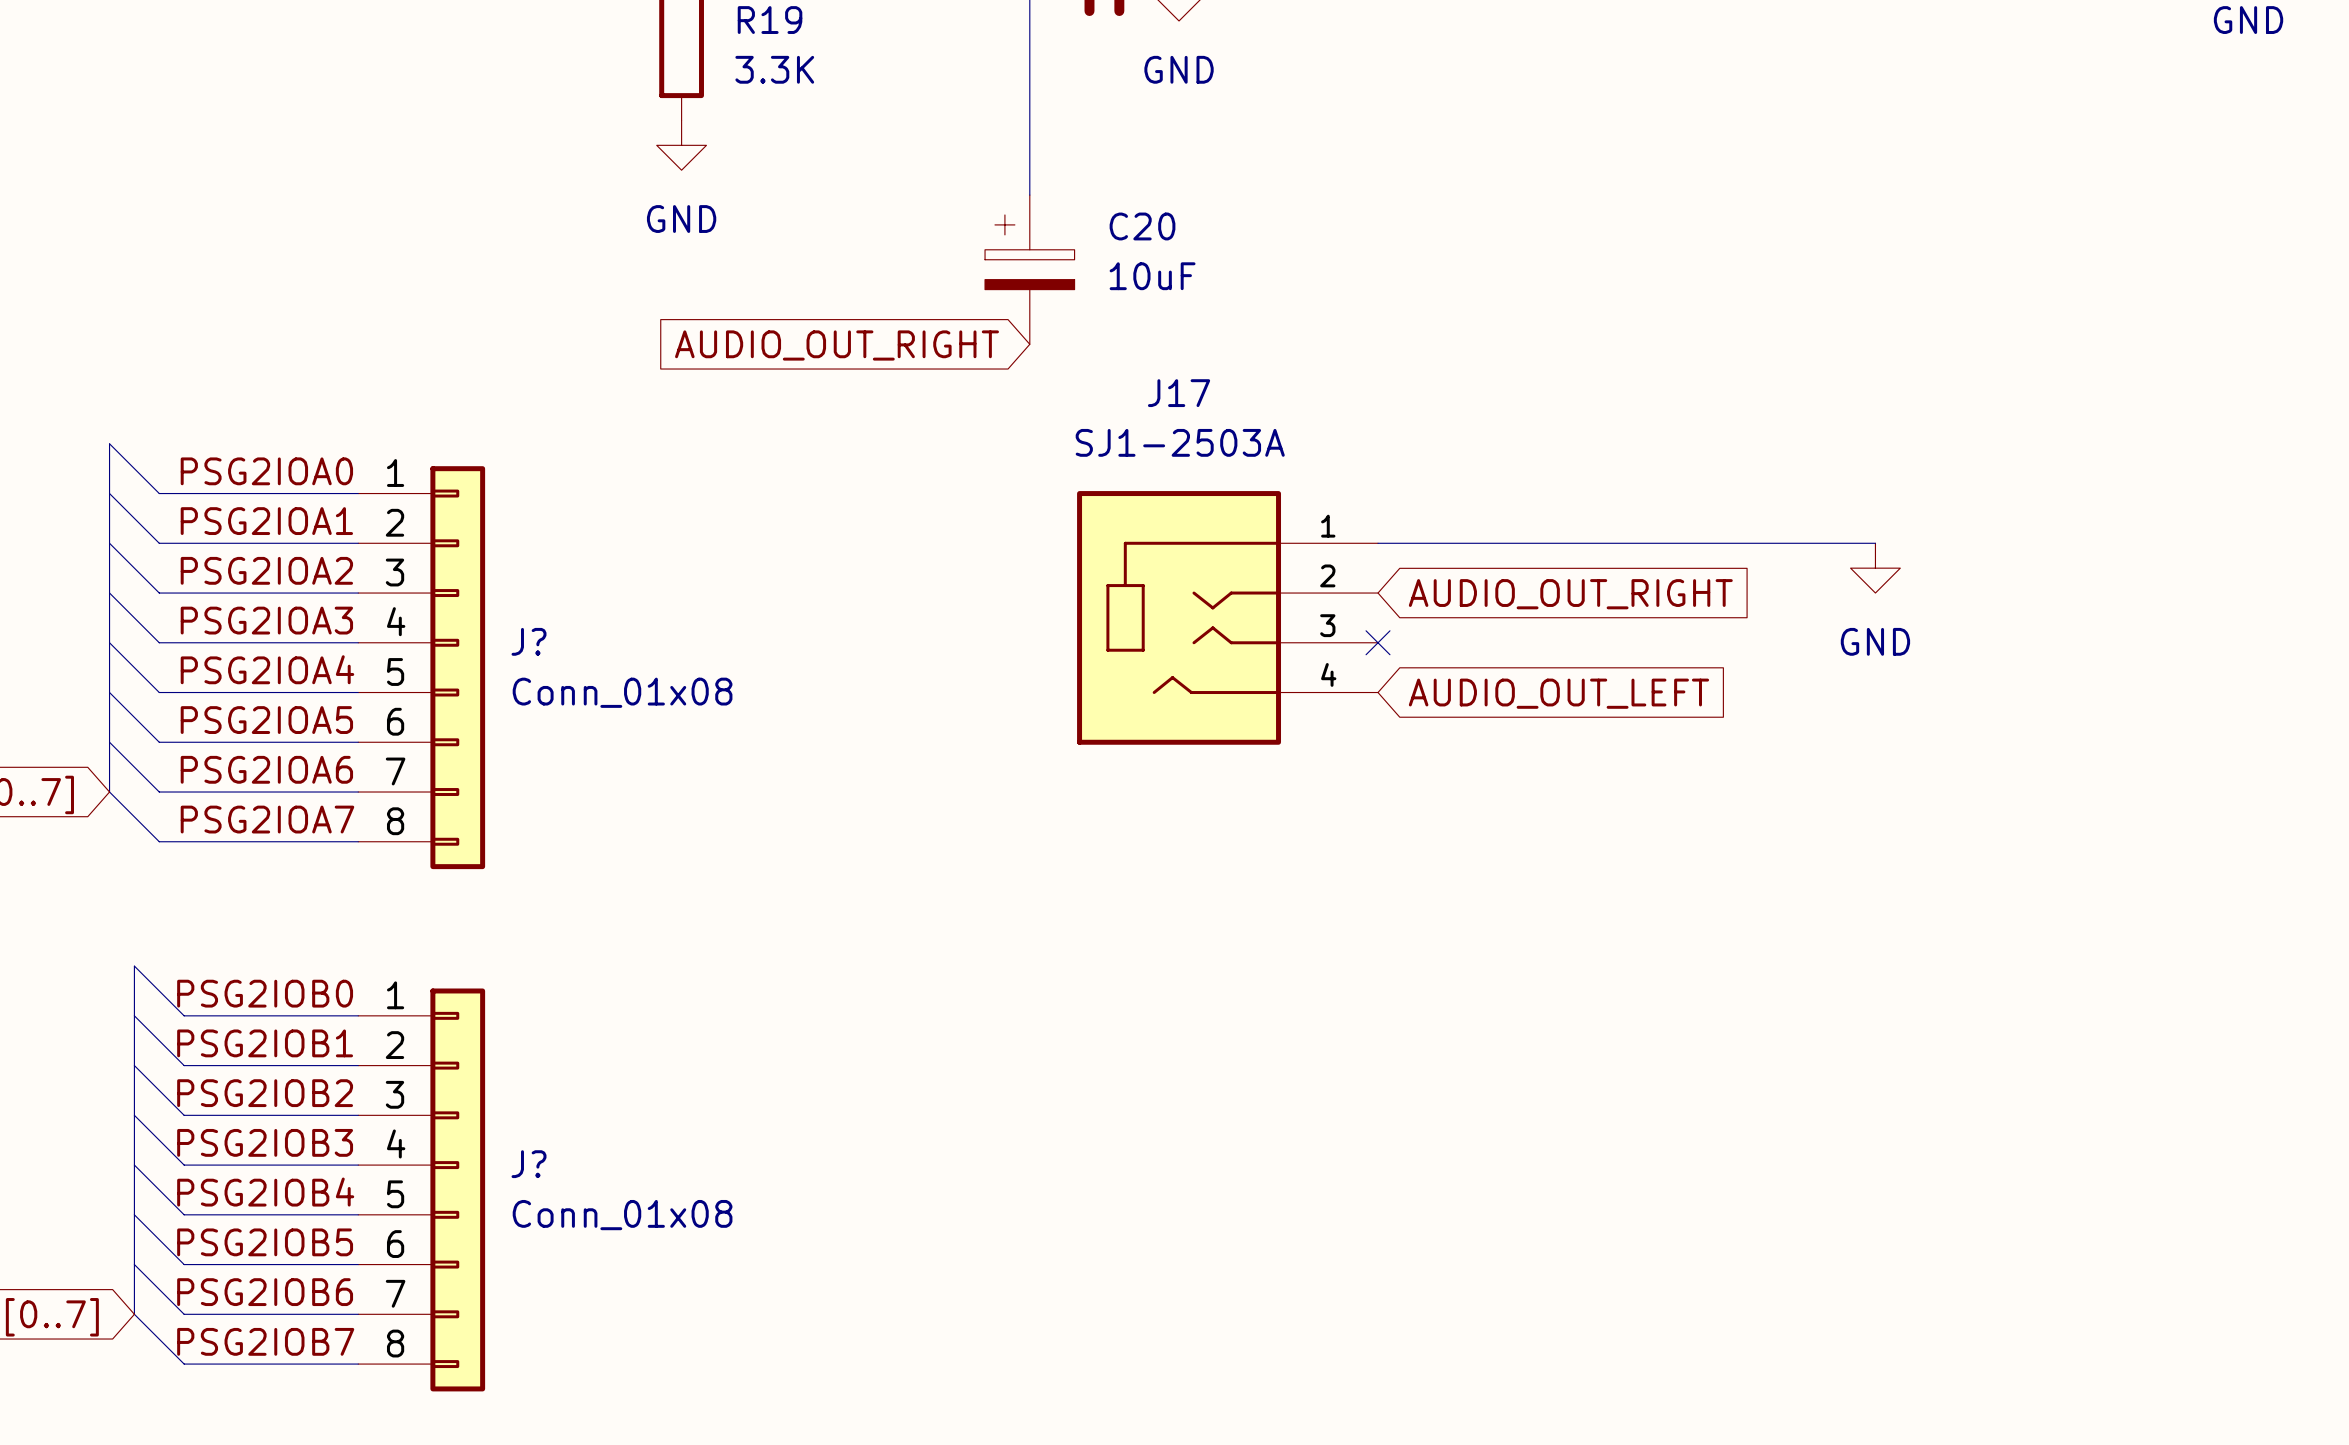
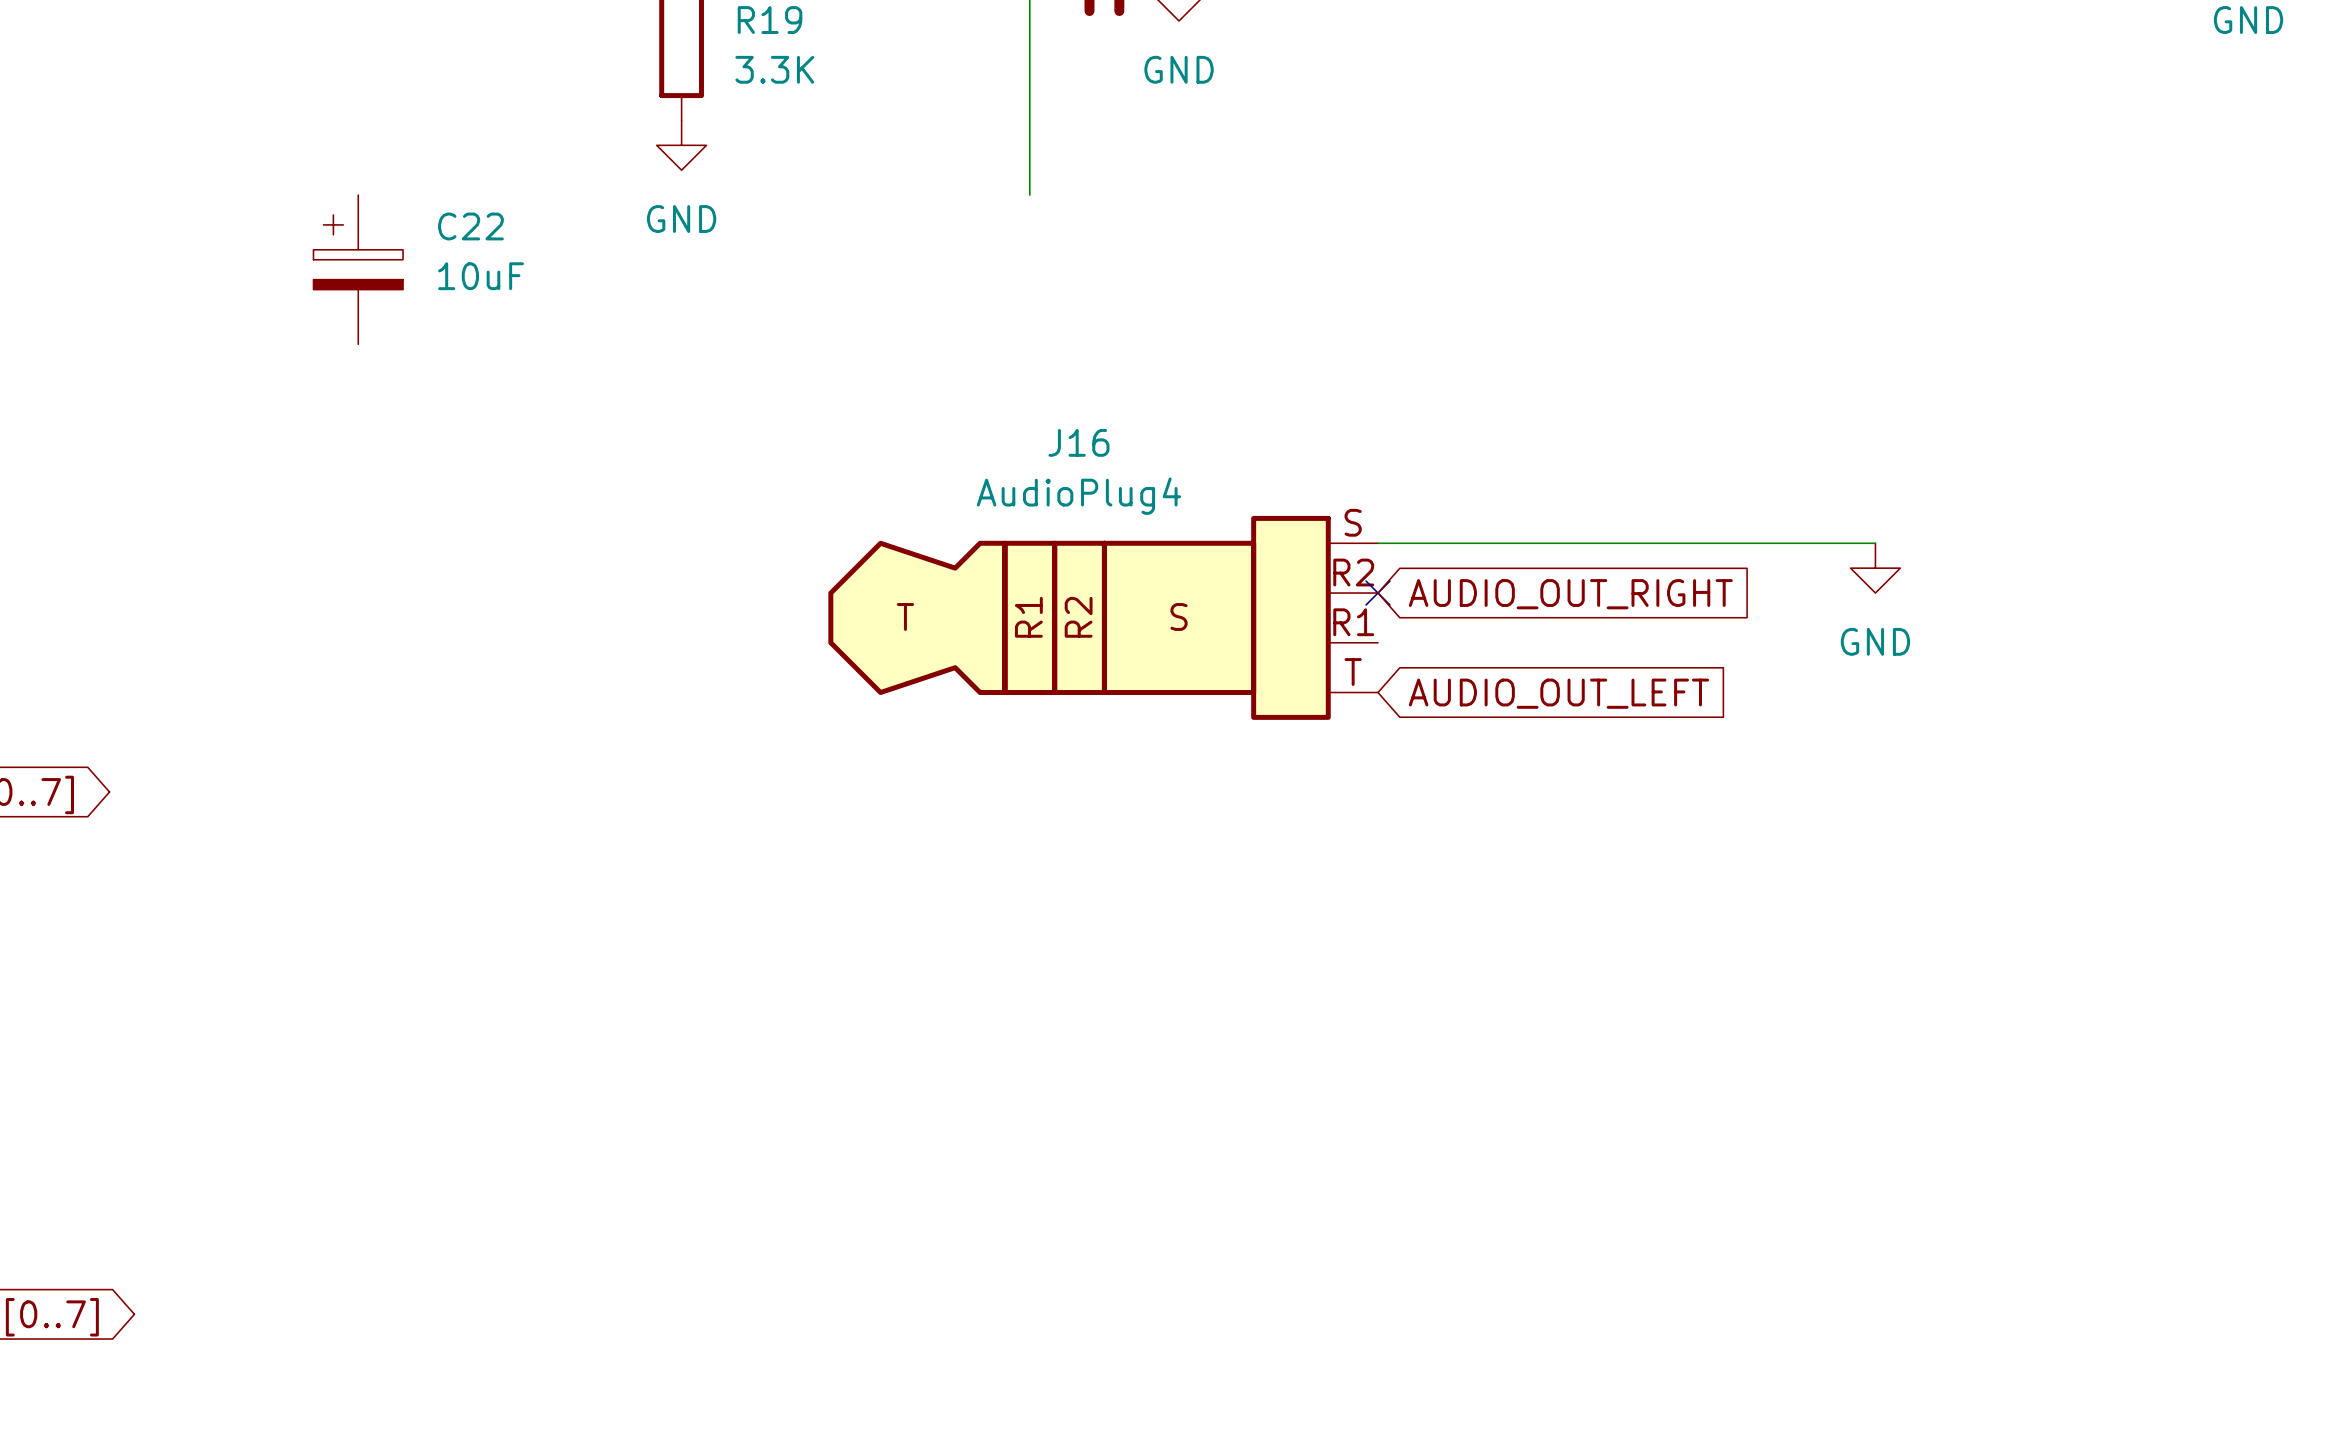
C22: none -> 10uF (358, 269)
C20: 10uF (1029, 269) -> none
global label: AUDIO_OUT_RIGHT (837, 345) -> none
wire: (109, 443) (159, 493) (358, 493) -> none
bus: (109, 443) (109, 792) -> none
label: PSG2IOA0 (266, 471) -> none
wire: (109, 493) (159, 543) (358, 543) -> none
label: PSG2IOA1 (266, 521) -> none
wire: (109, 543) (159, 593) (358, 593) -> none
label: PSG2IOA2 (266, 570) -> none
wire: (109, 593) (159, 642) (358, 642) -> none
J16: none -> AudioPlug4 (1103, 617)
J17: SJ1-2503A (1227, 617) -> none
label: PSG2IOA3 (266, 620) -> none
wire: (109, 642) (159, 692) (358, 692) -> none
no-connect mark position: (1378, 642) -> (1378, 593)
J?: Conn_01x08 (421, 667) -> none
label: PSG2IOA4 (267, 669) -> none
wire: (109, 692) (159, 742) (358, 742) -> none
label: PSG2IOA5 (266, 720) -> none
wire: (109, 742) (159, 792) (358, 792) -> none
label: PSG2IOA6 (266, 769) -> none
wire: (109, 792) (159, 841) (358, 841) -> none
label: PSG2IOA7 (267, 819) -> none
wire: (134, 966) (184, 1015) (358, 1015) -> none
bus: (134, 966) (134, 1314) -> none
label: PSG2IOB0 (265, 993) -> none
wire: (134, 1015) (184, 1065) (358, 1065) -> none
label: PSG2IOB1 (265, 1043) -> none
wire: (134, 1065) (184, 1115) (358, 1115) -> none
label: PSG2IOB2 (265, 1093) -> none
wire: (134, 1115) (184, 1165) (358, 1165) -> none
label: PSG2IOB3 (265, 1142) -> none
wire: (134, 1165) (184, 1214) (358, 1214) -> none
J?: Conn_01x08 (421, 1189) -> none
label: PSG2IOB4 (265, 1192) -> none
wire: (134, 1214) (184, 1264) (358, 1264) -> none
label: PSG2IOB5 (265, 1242) -> none
wire: (134, 1264) (184, 1314) (358, 1314) -> none
label: PSG2IOB6 (265, 1292) -> none
wire: (134, 1314) (184, 1364) (358, 1364) -> none
label: PSG2IOB7 (265, 1341) -> none

